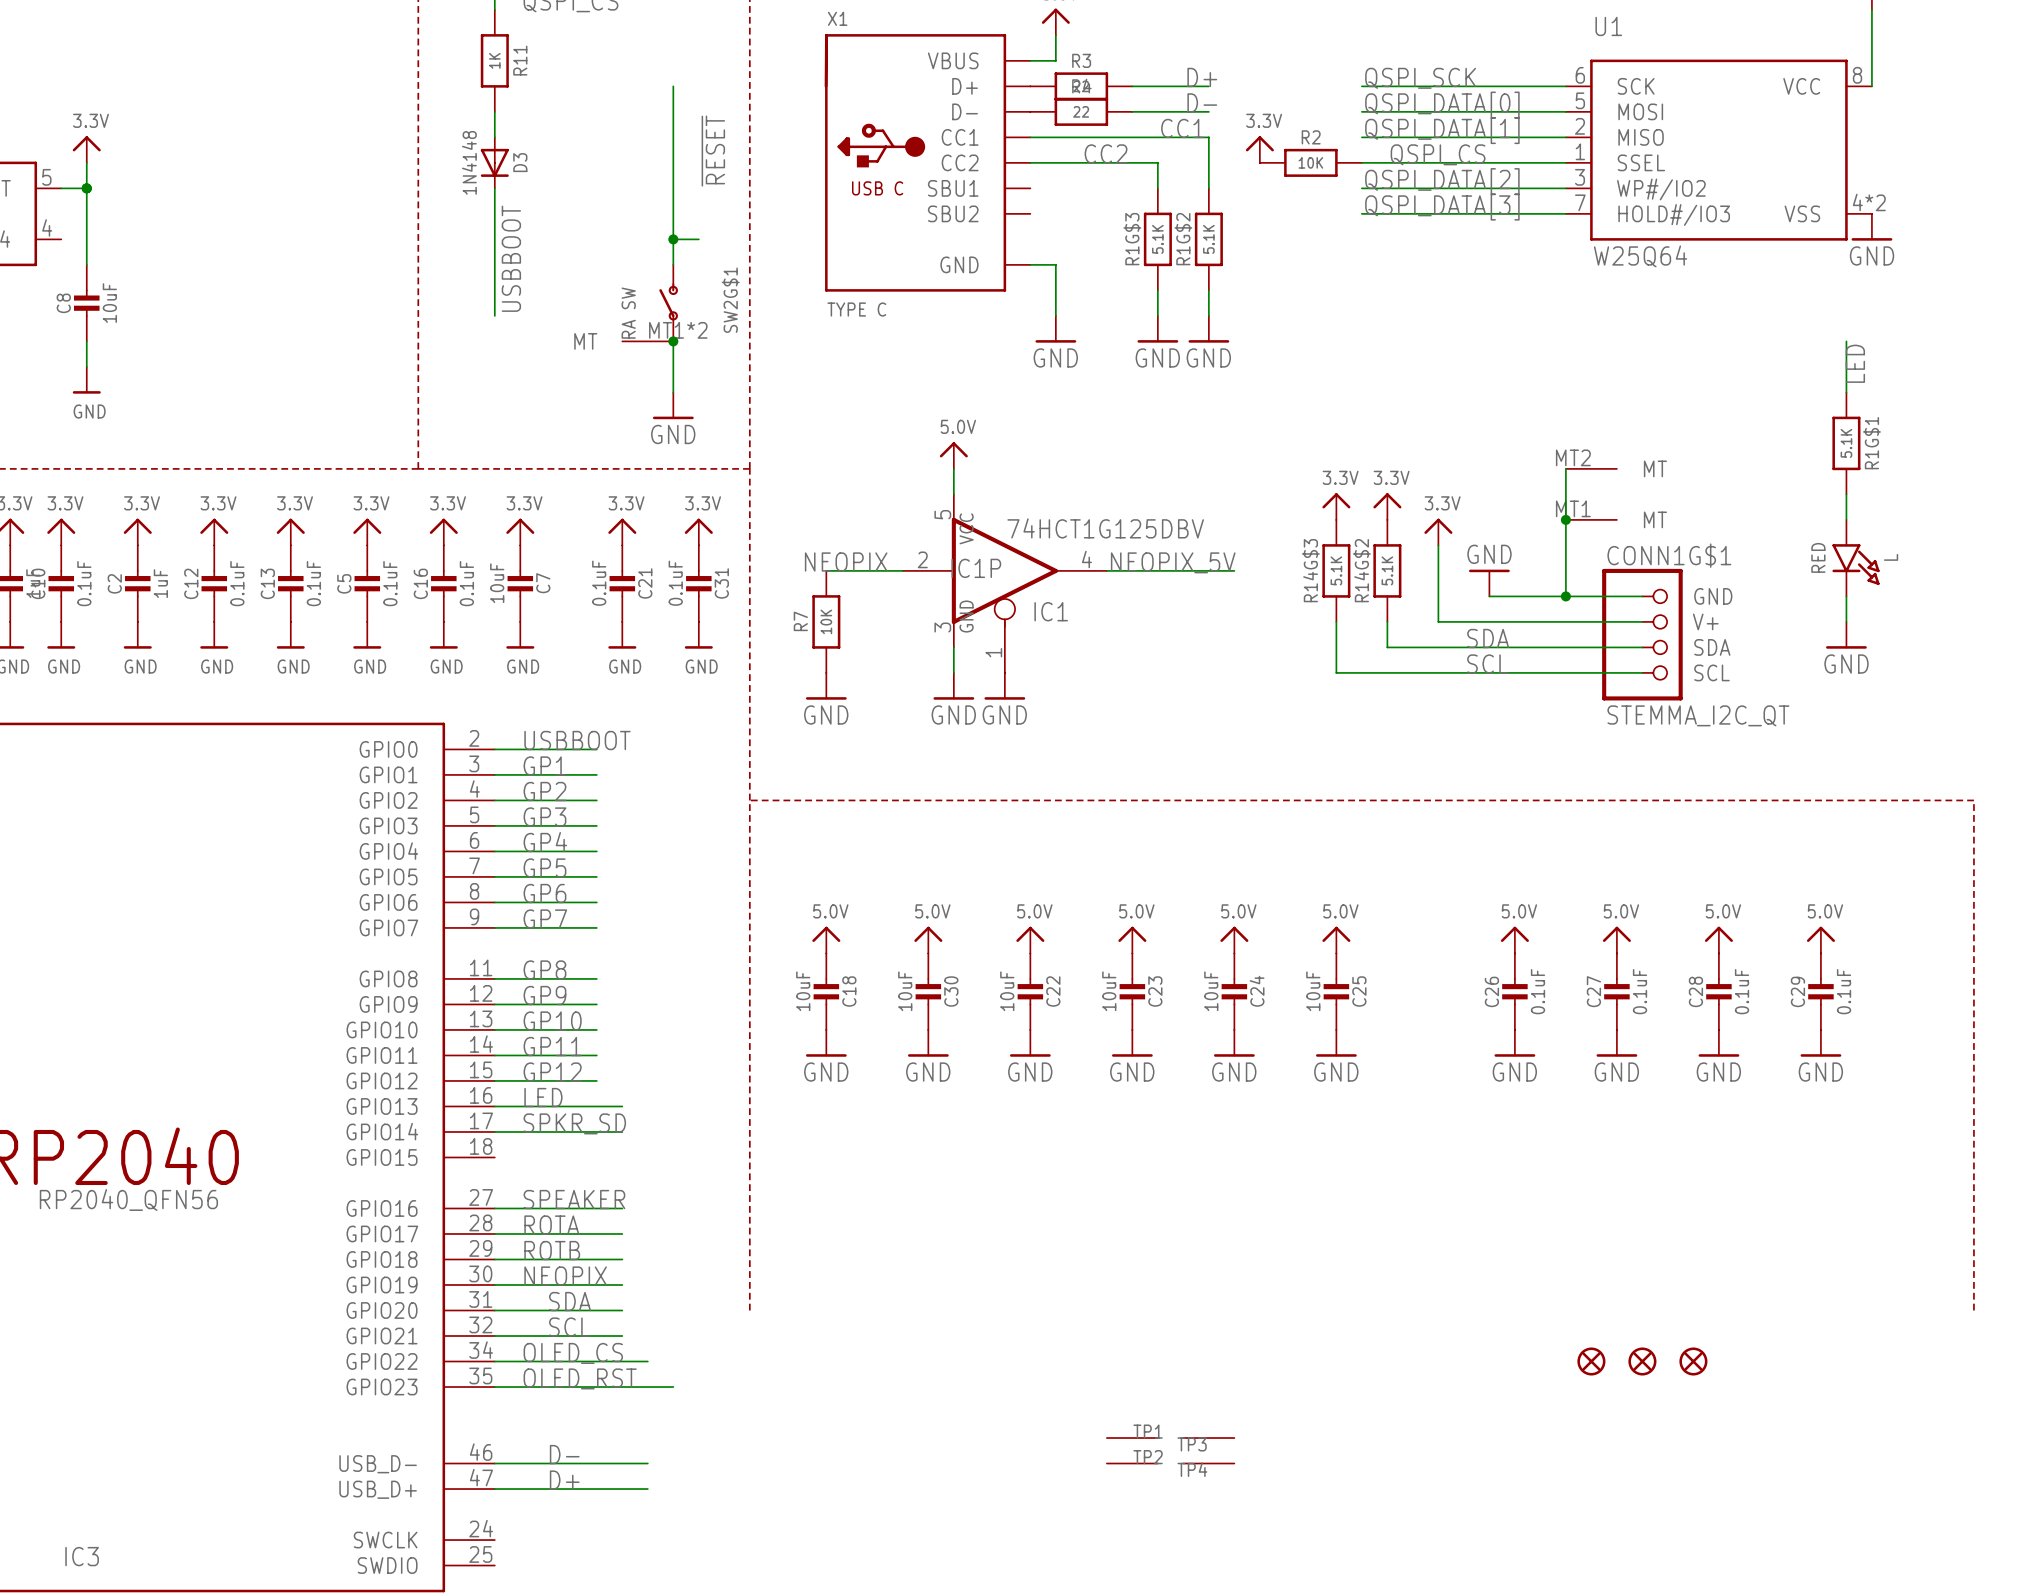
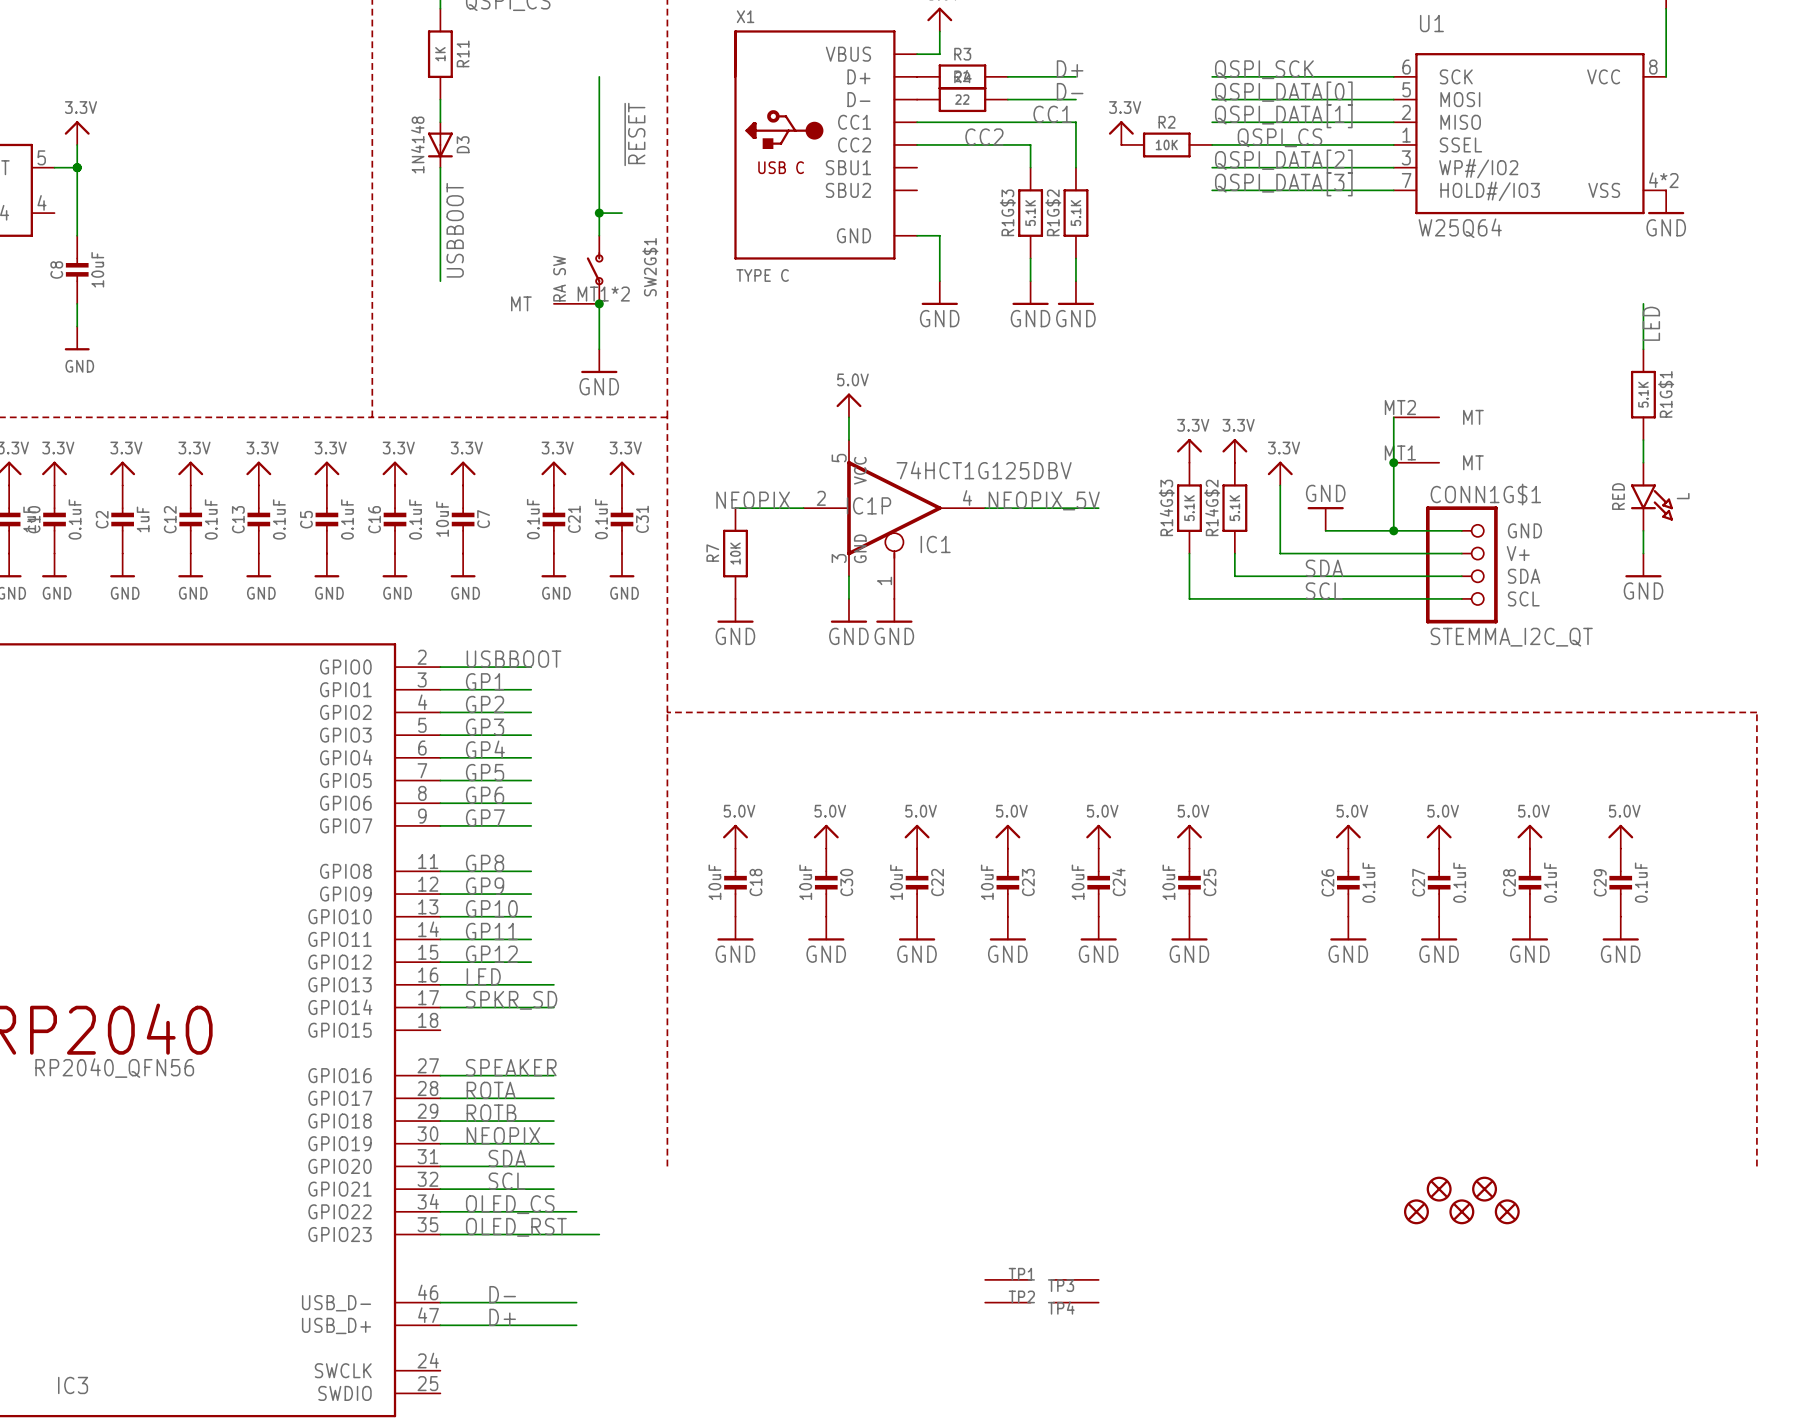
part: none -> (1439, 1189)
part: none -> (1484, 1189)

